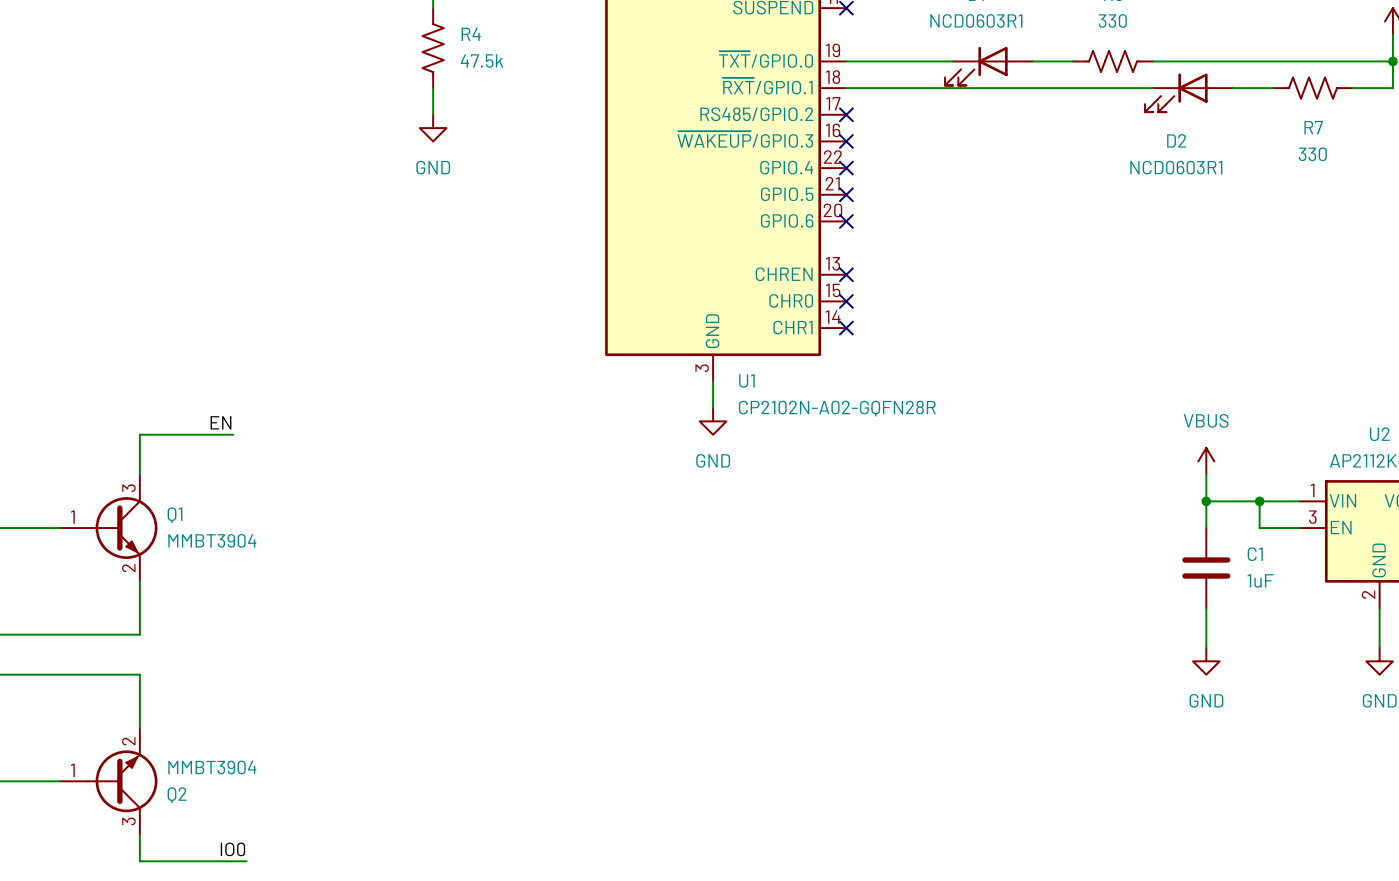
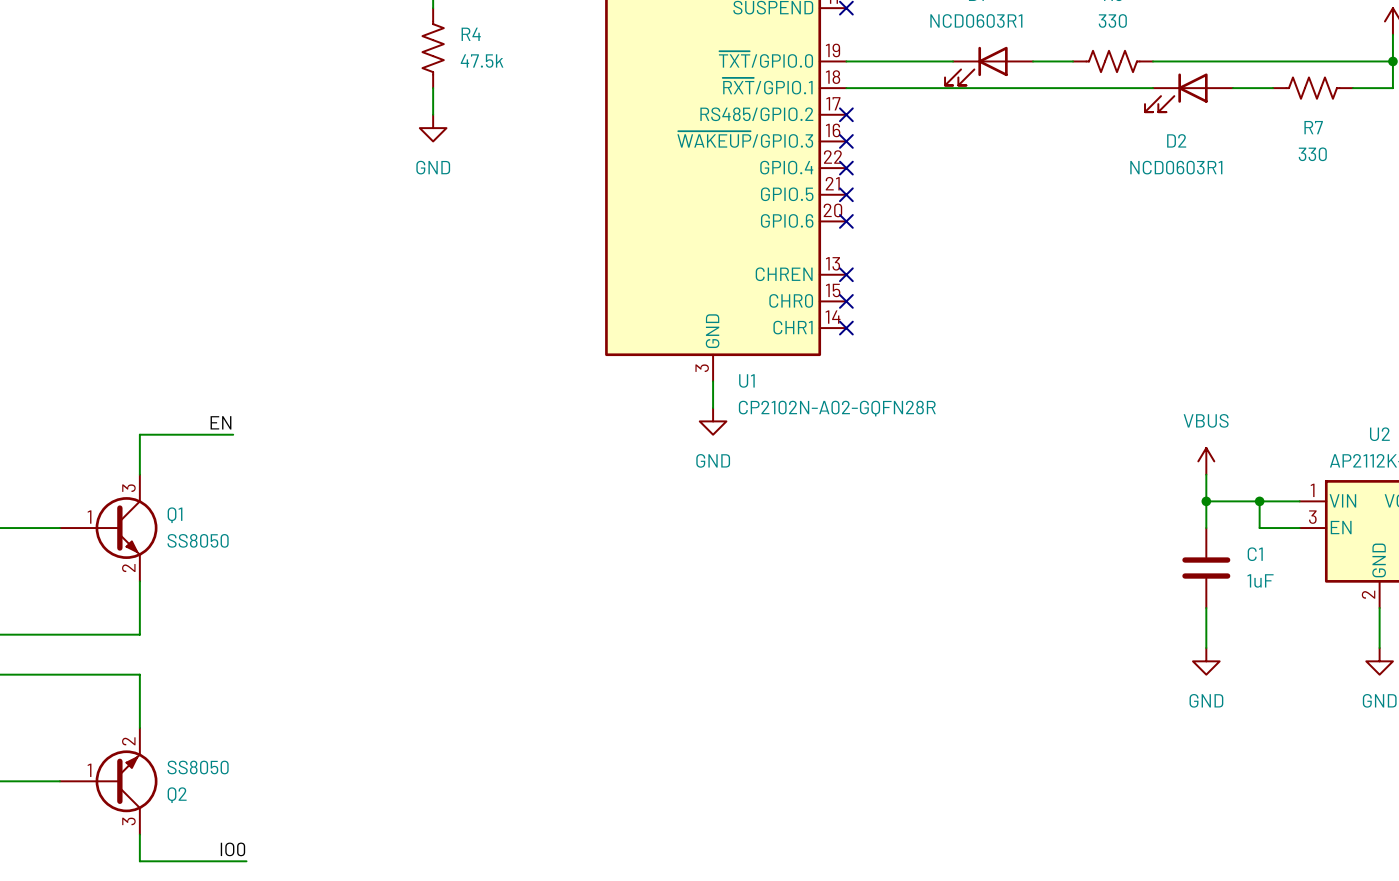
Q1 symbol: [59, 474, 158, 582] -> [59, 474, 158, 582]
Q1 value: MMBT3904 (212, 540) -> SS8050 (198, 540)
Q2 symbol: [59, 727, 158, 835] -> [59, 727, 158, 835]
Q2 value: MMBT3904 (212, 767) -> SS8050 (198, 767)

